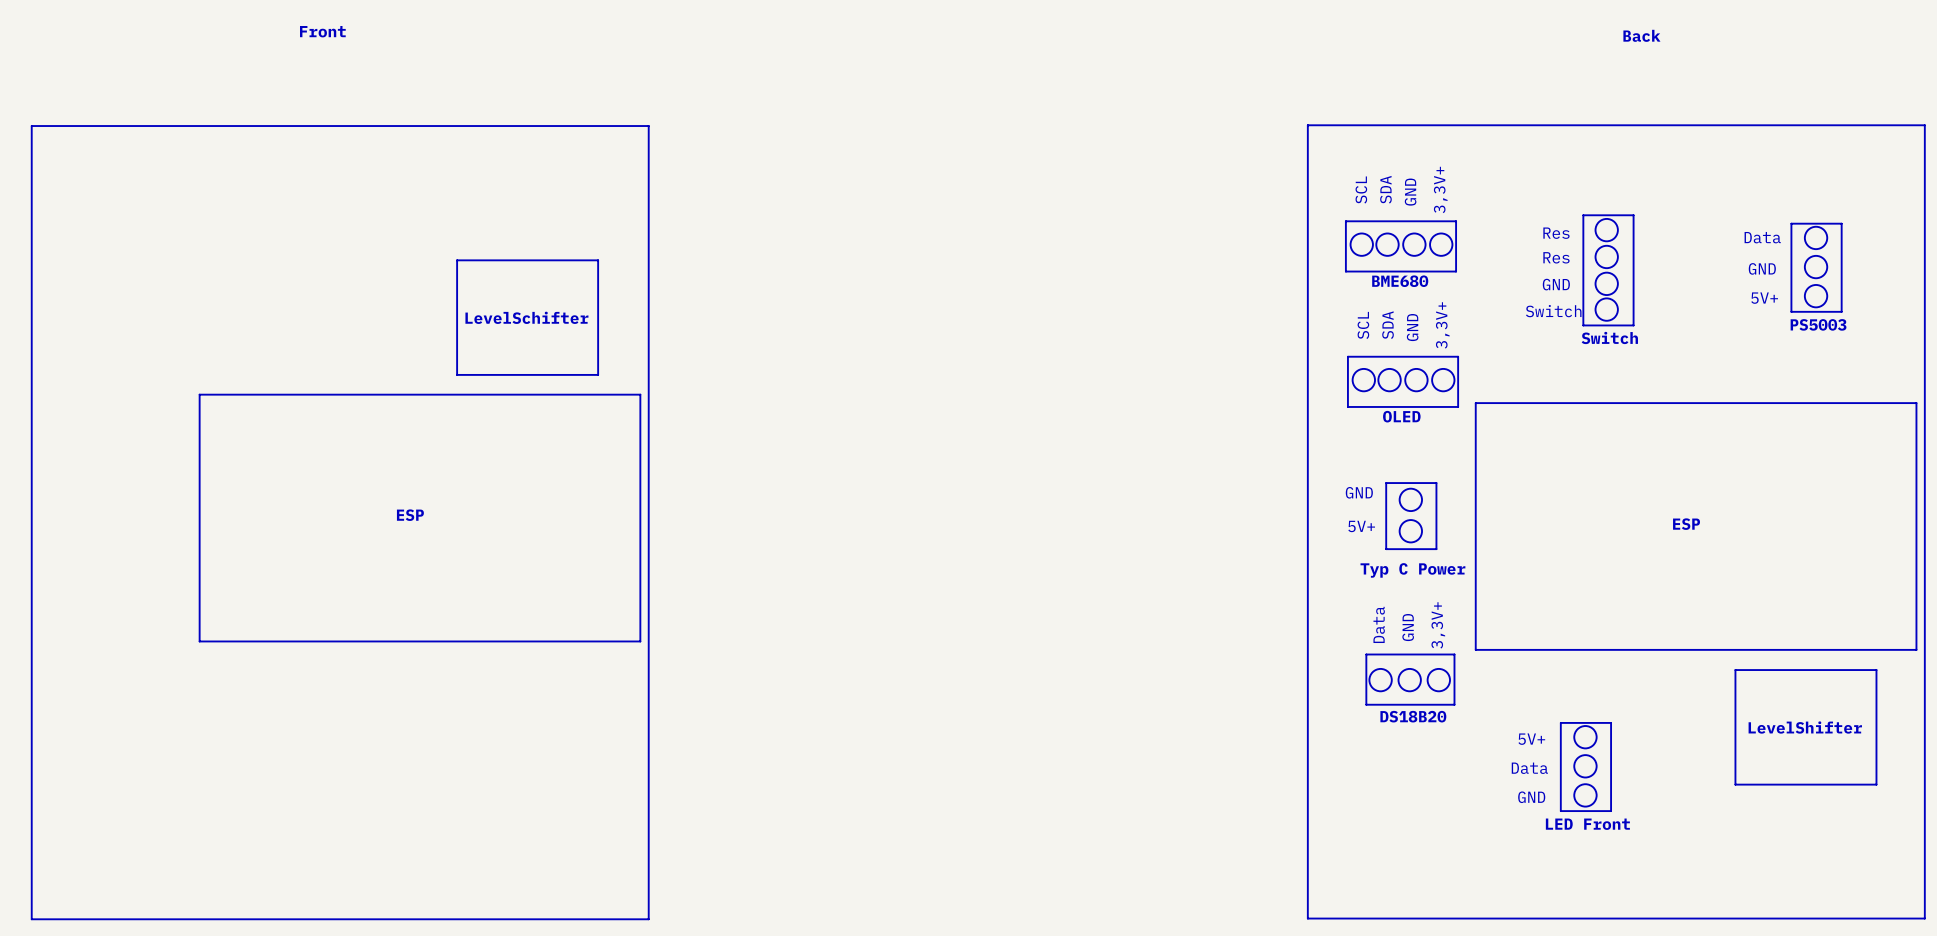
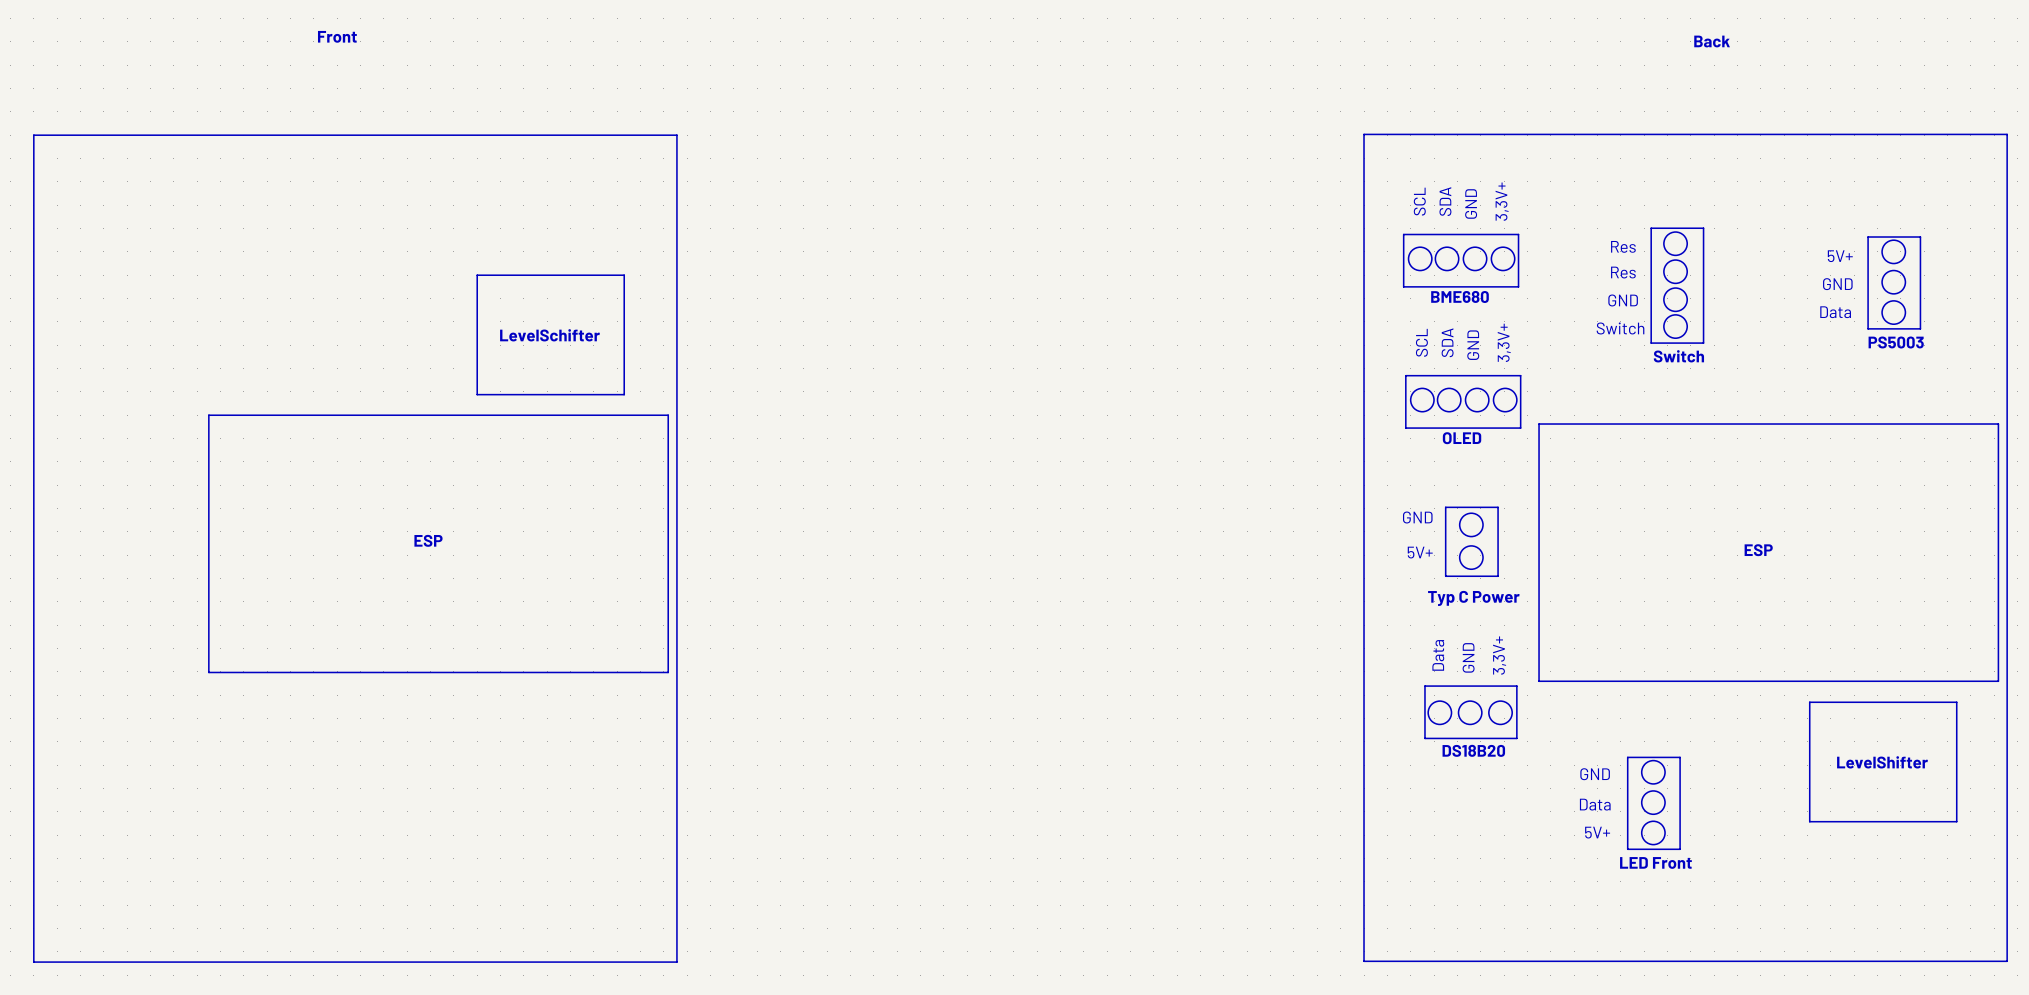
text position: Data (1762, 237) -> Data (1835, 312)
text position: 5V+ (1764, 298) -> 5V+ (1840, 256)
text position: 5V+ (1531, 739) -> 5V+ (1597, 832)
text position: GND (1531, 797) -> GND (1595, 774)

